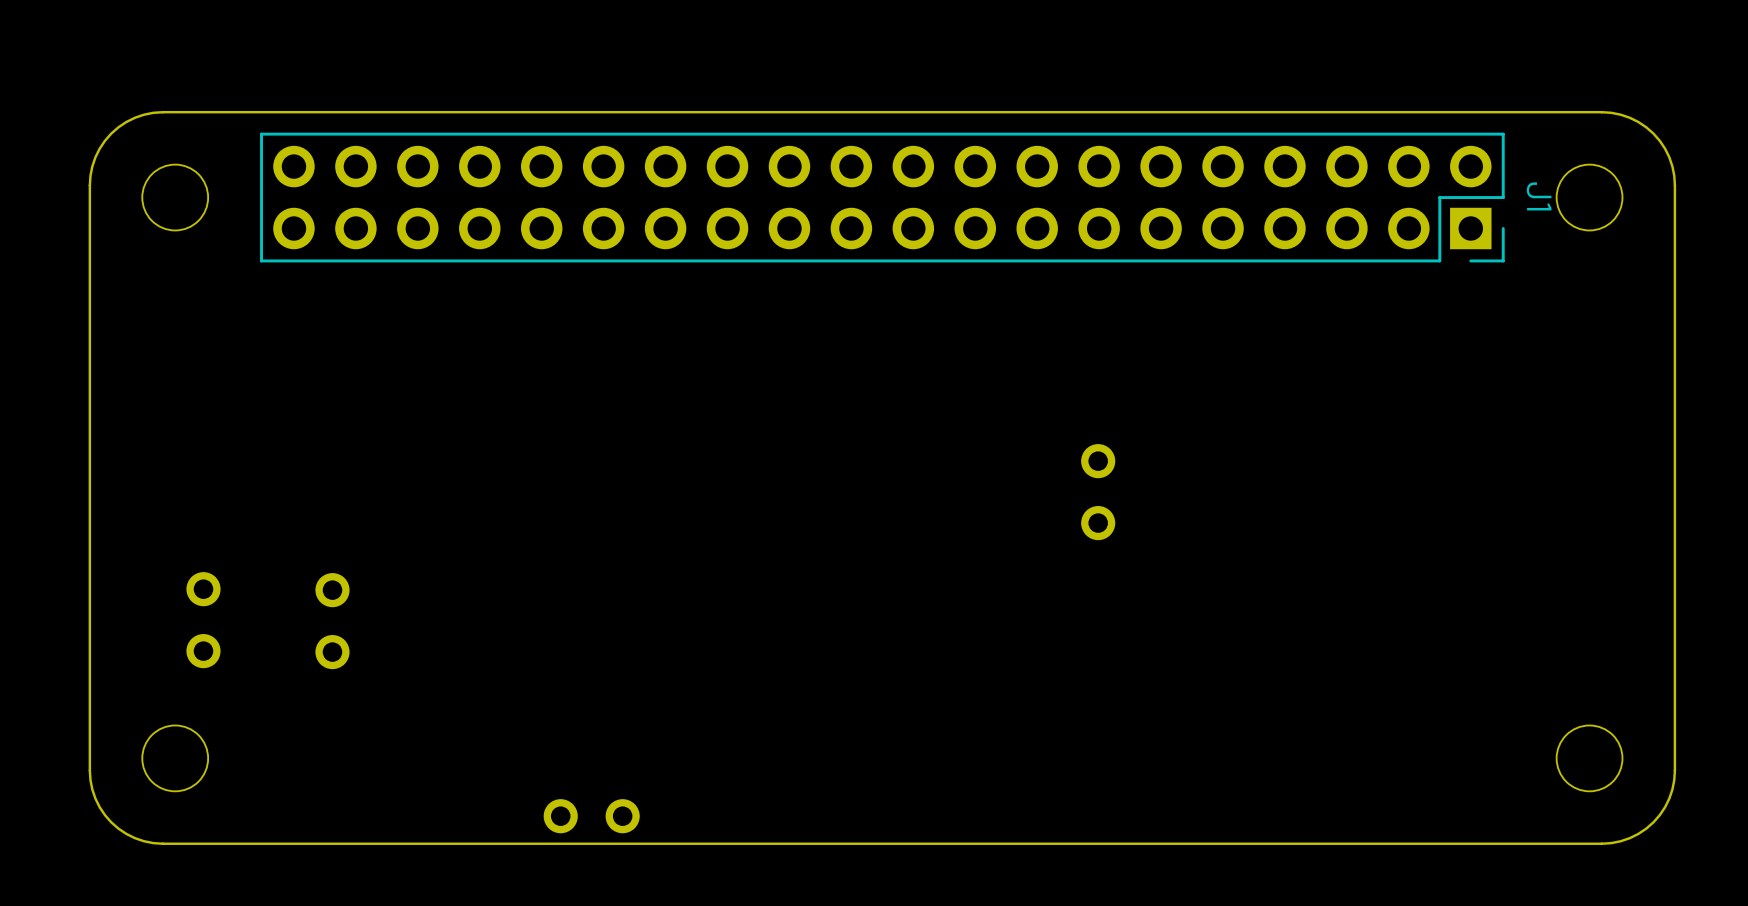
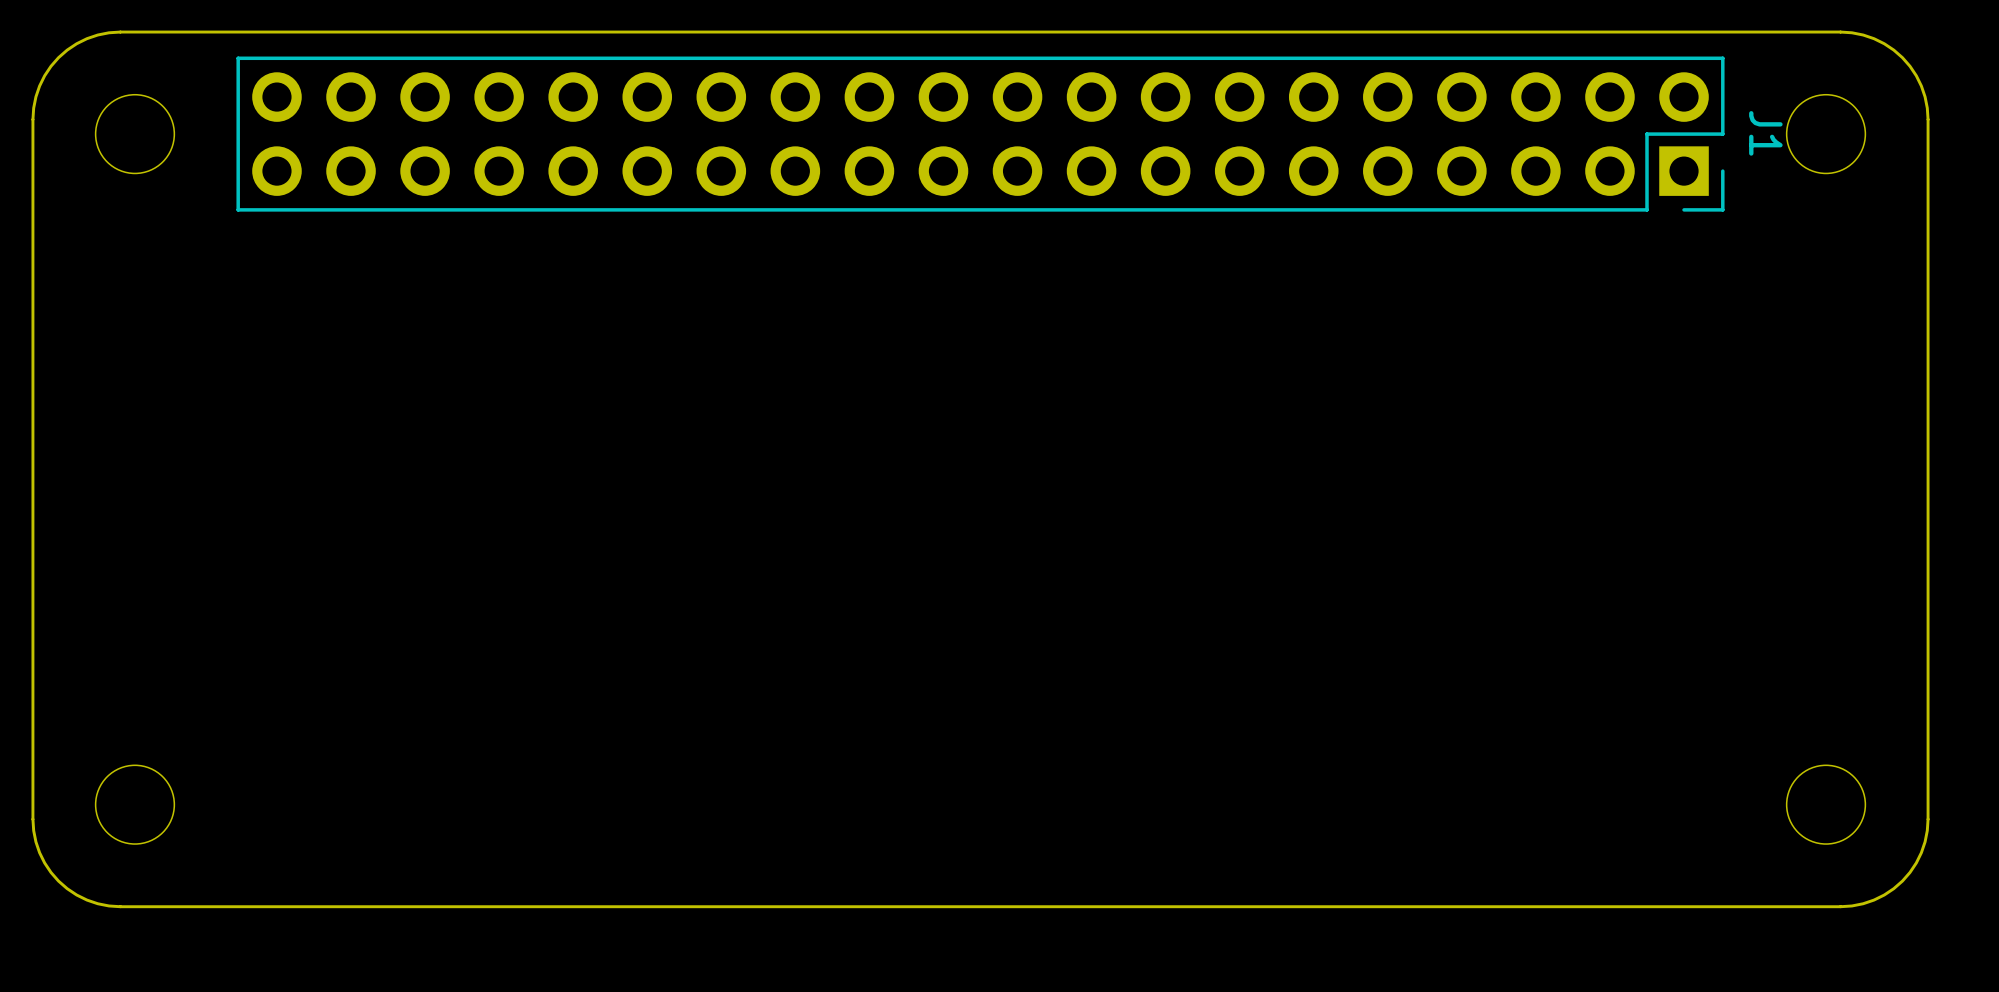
part: (1098, 492) -> none
part: (203, 620) -> none
part: (332, 621) -> none
part: (591, 816) -> none

